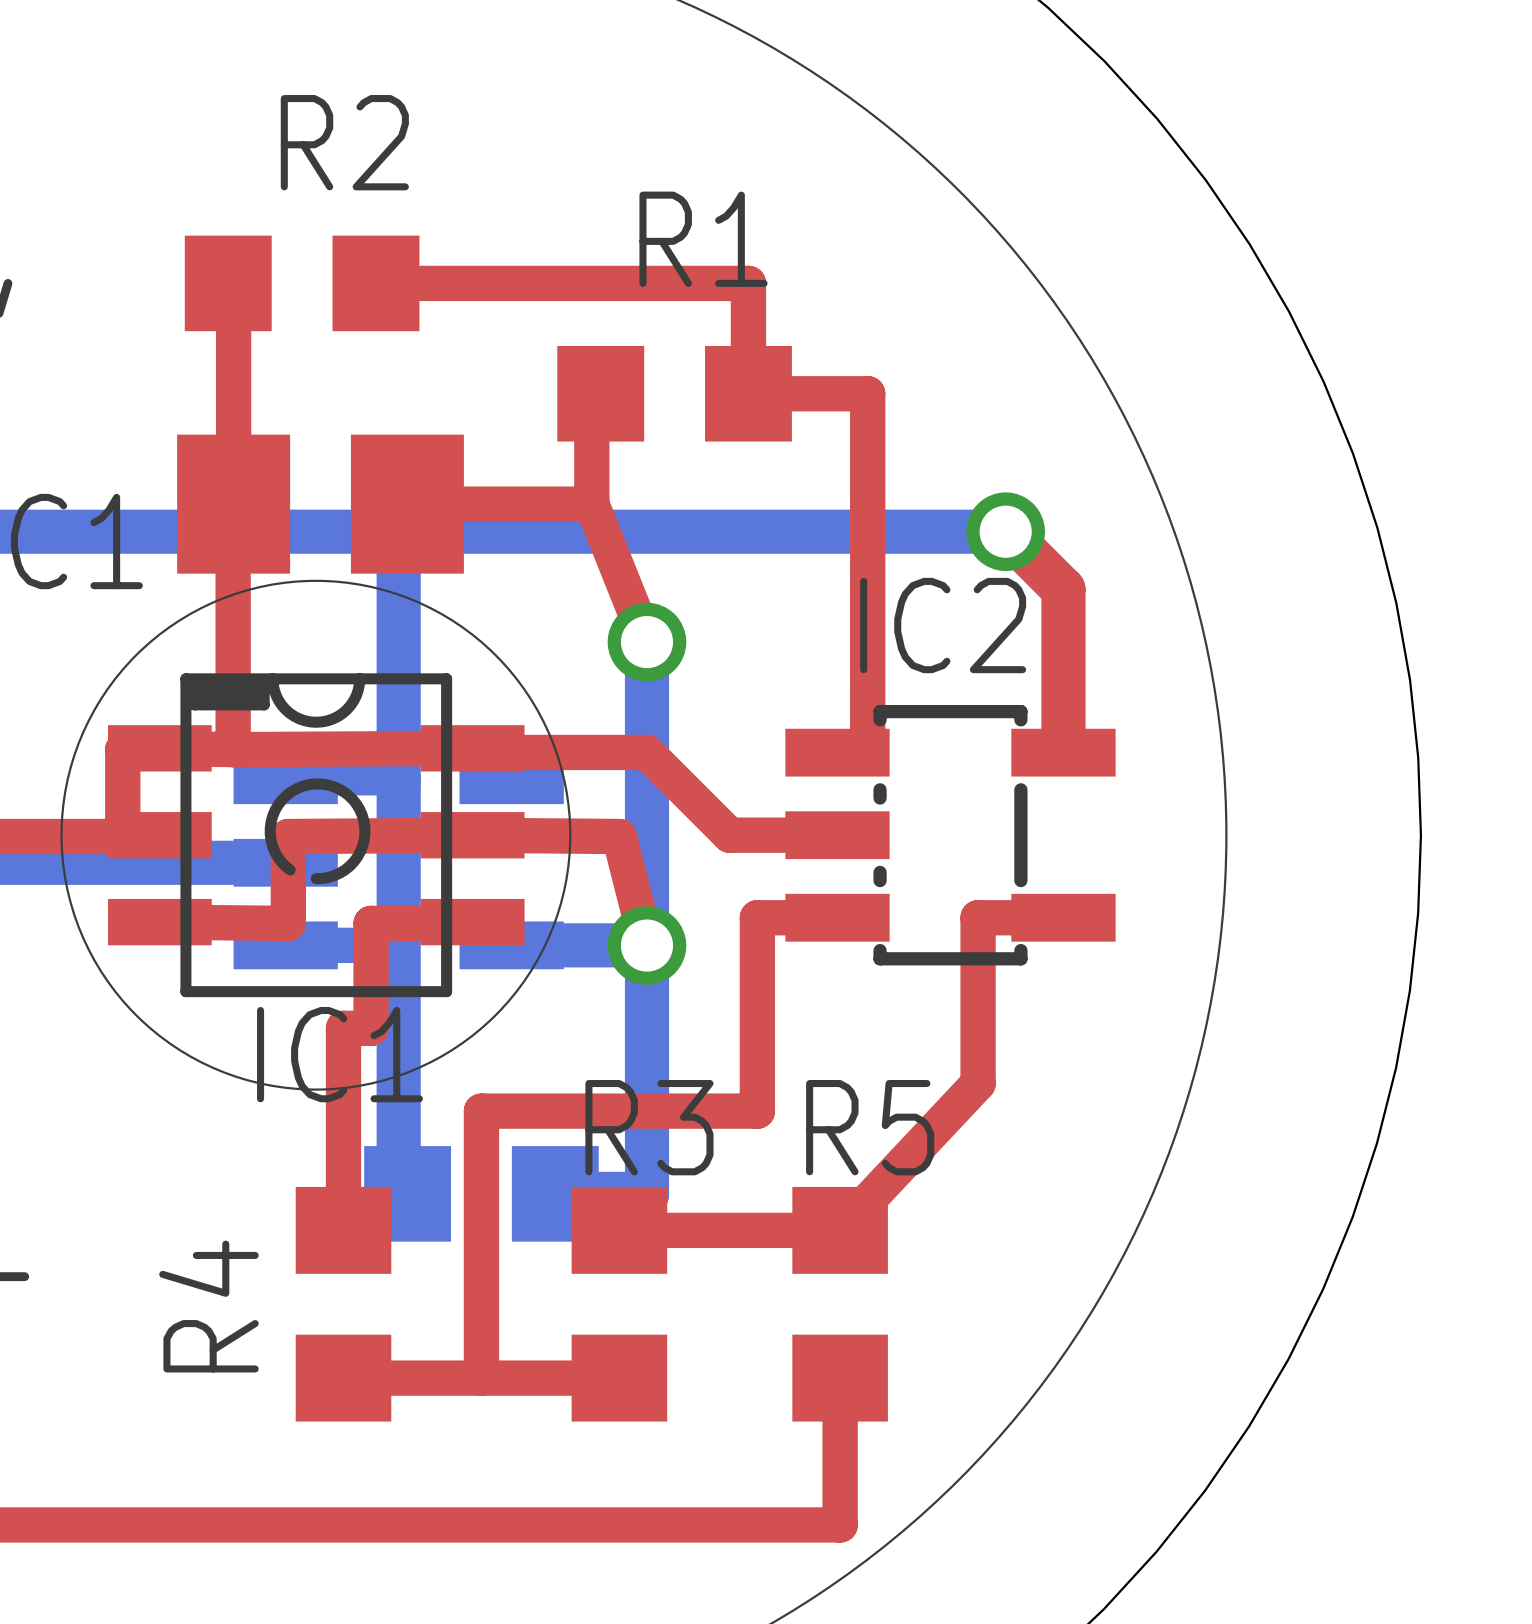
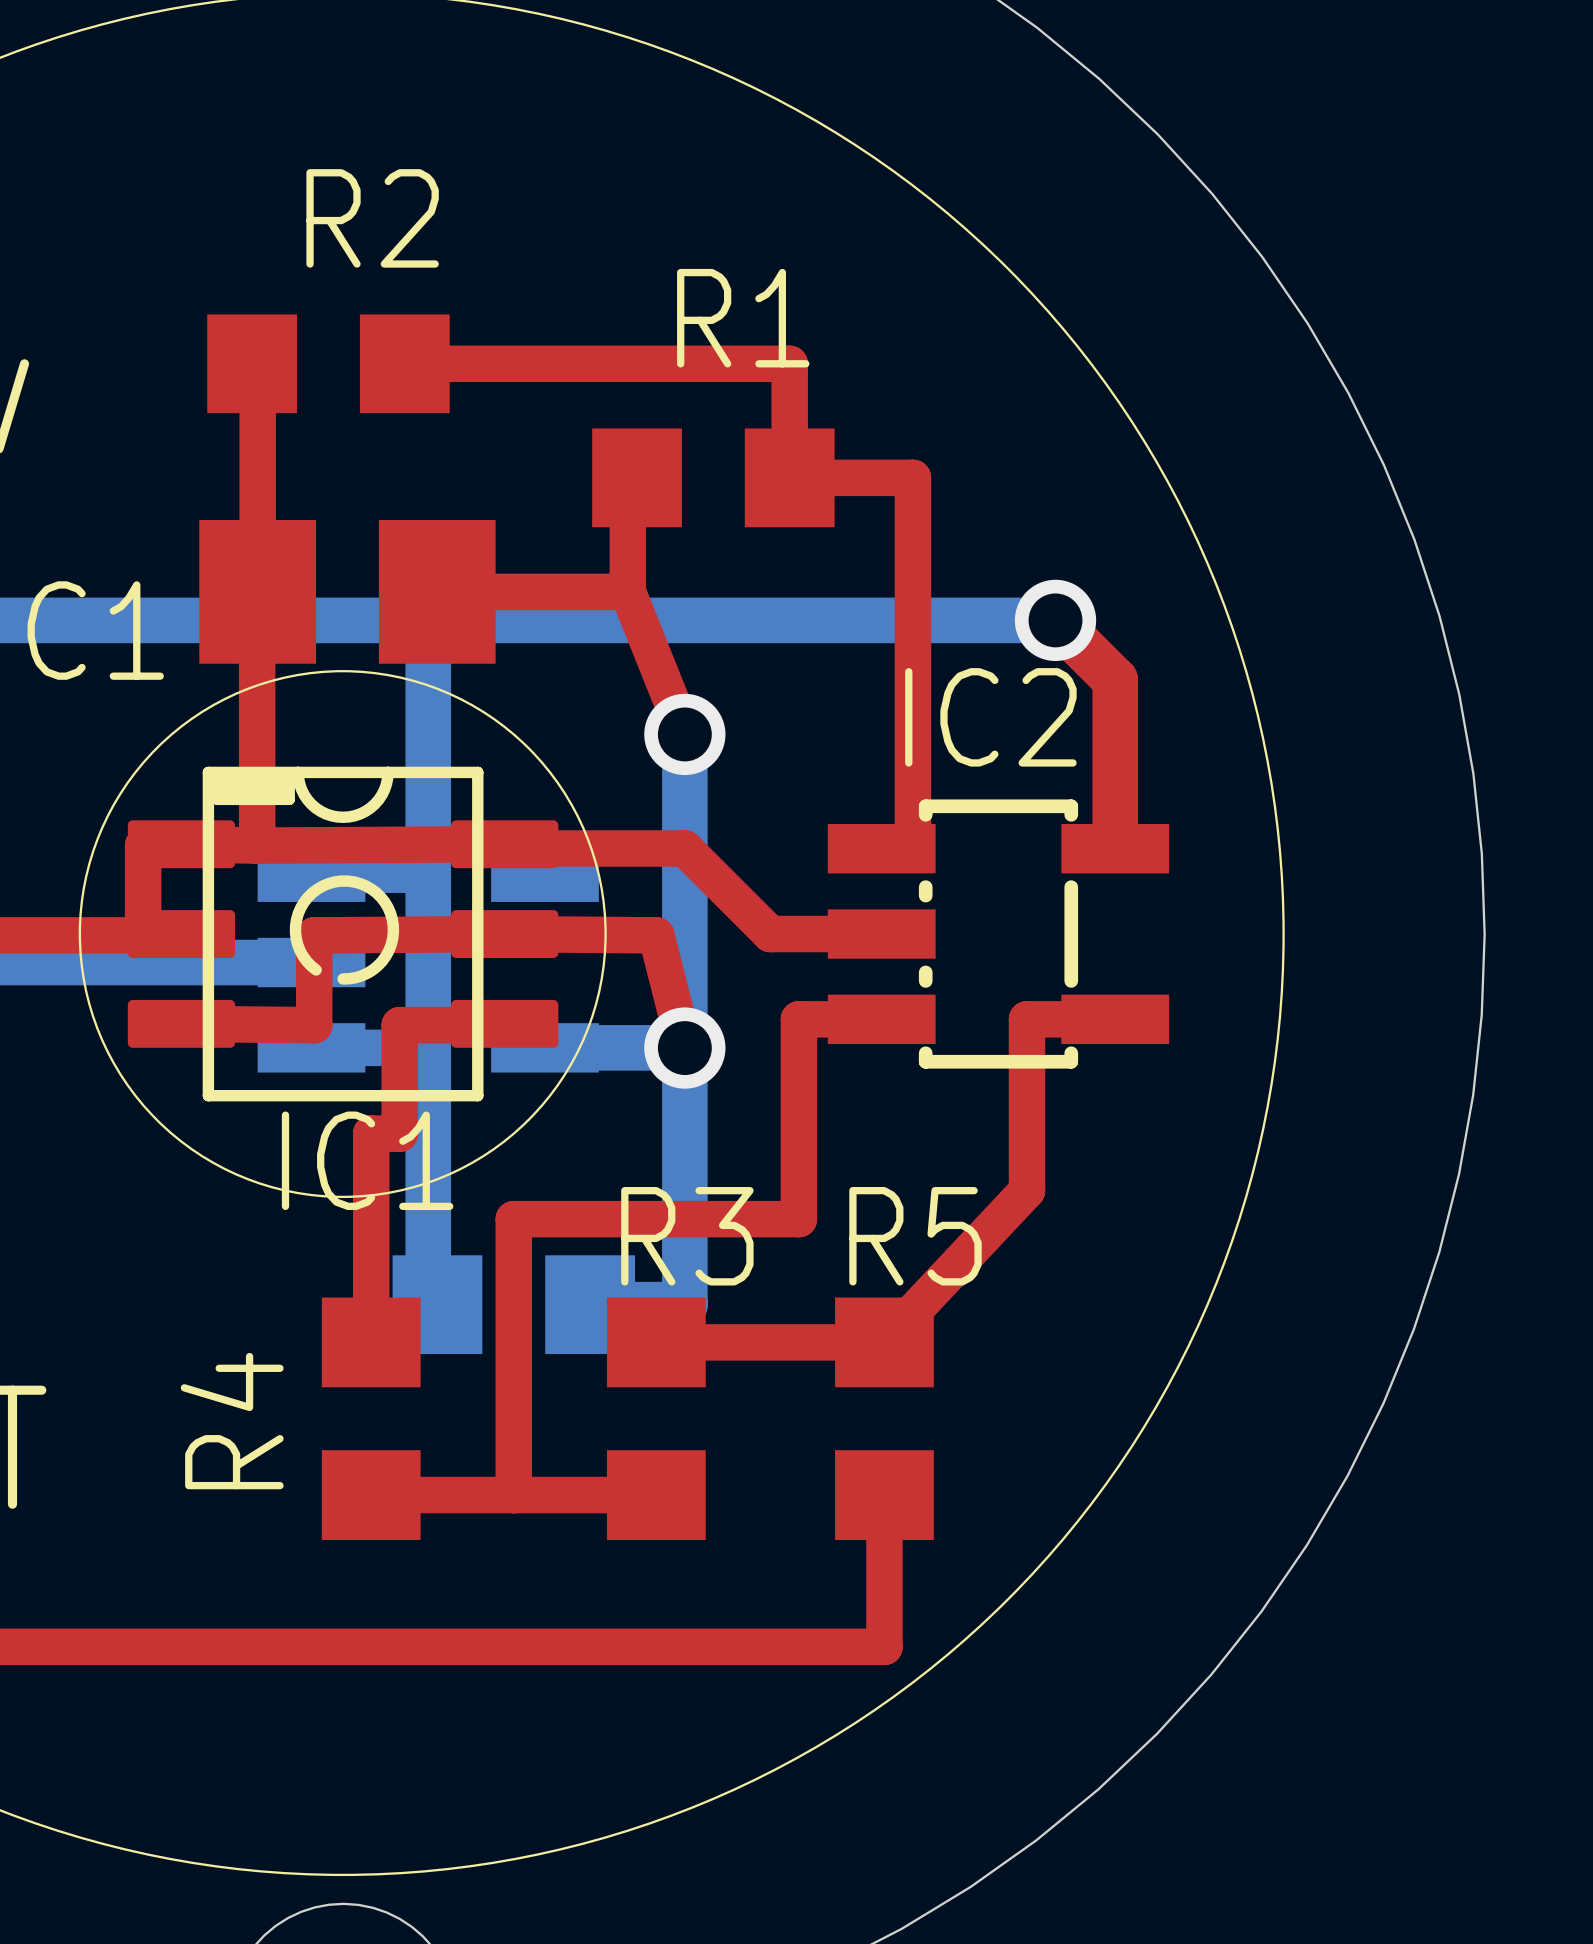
IC1 footprint: [107, 673, 525, 998] -> [127, 766, 559, 1102]

